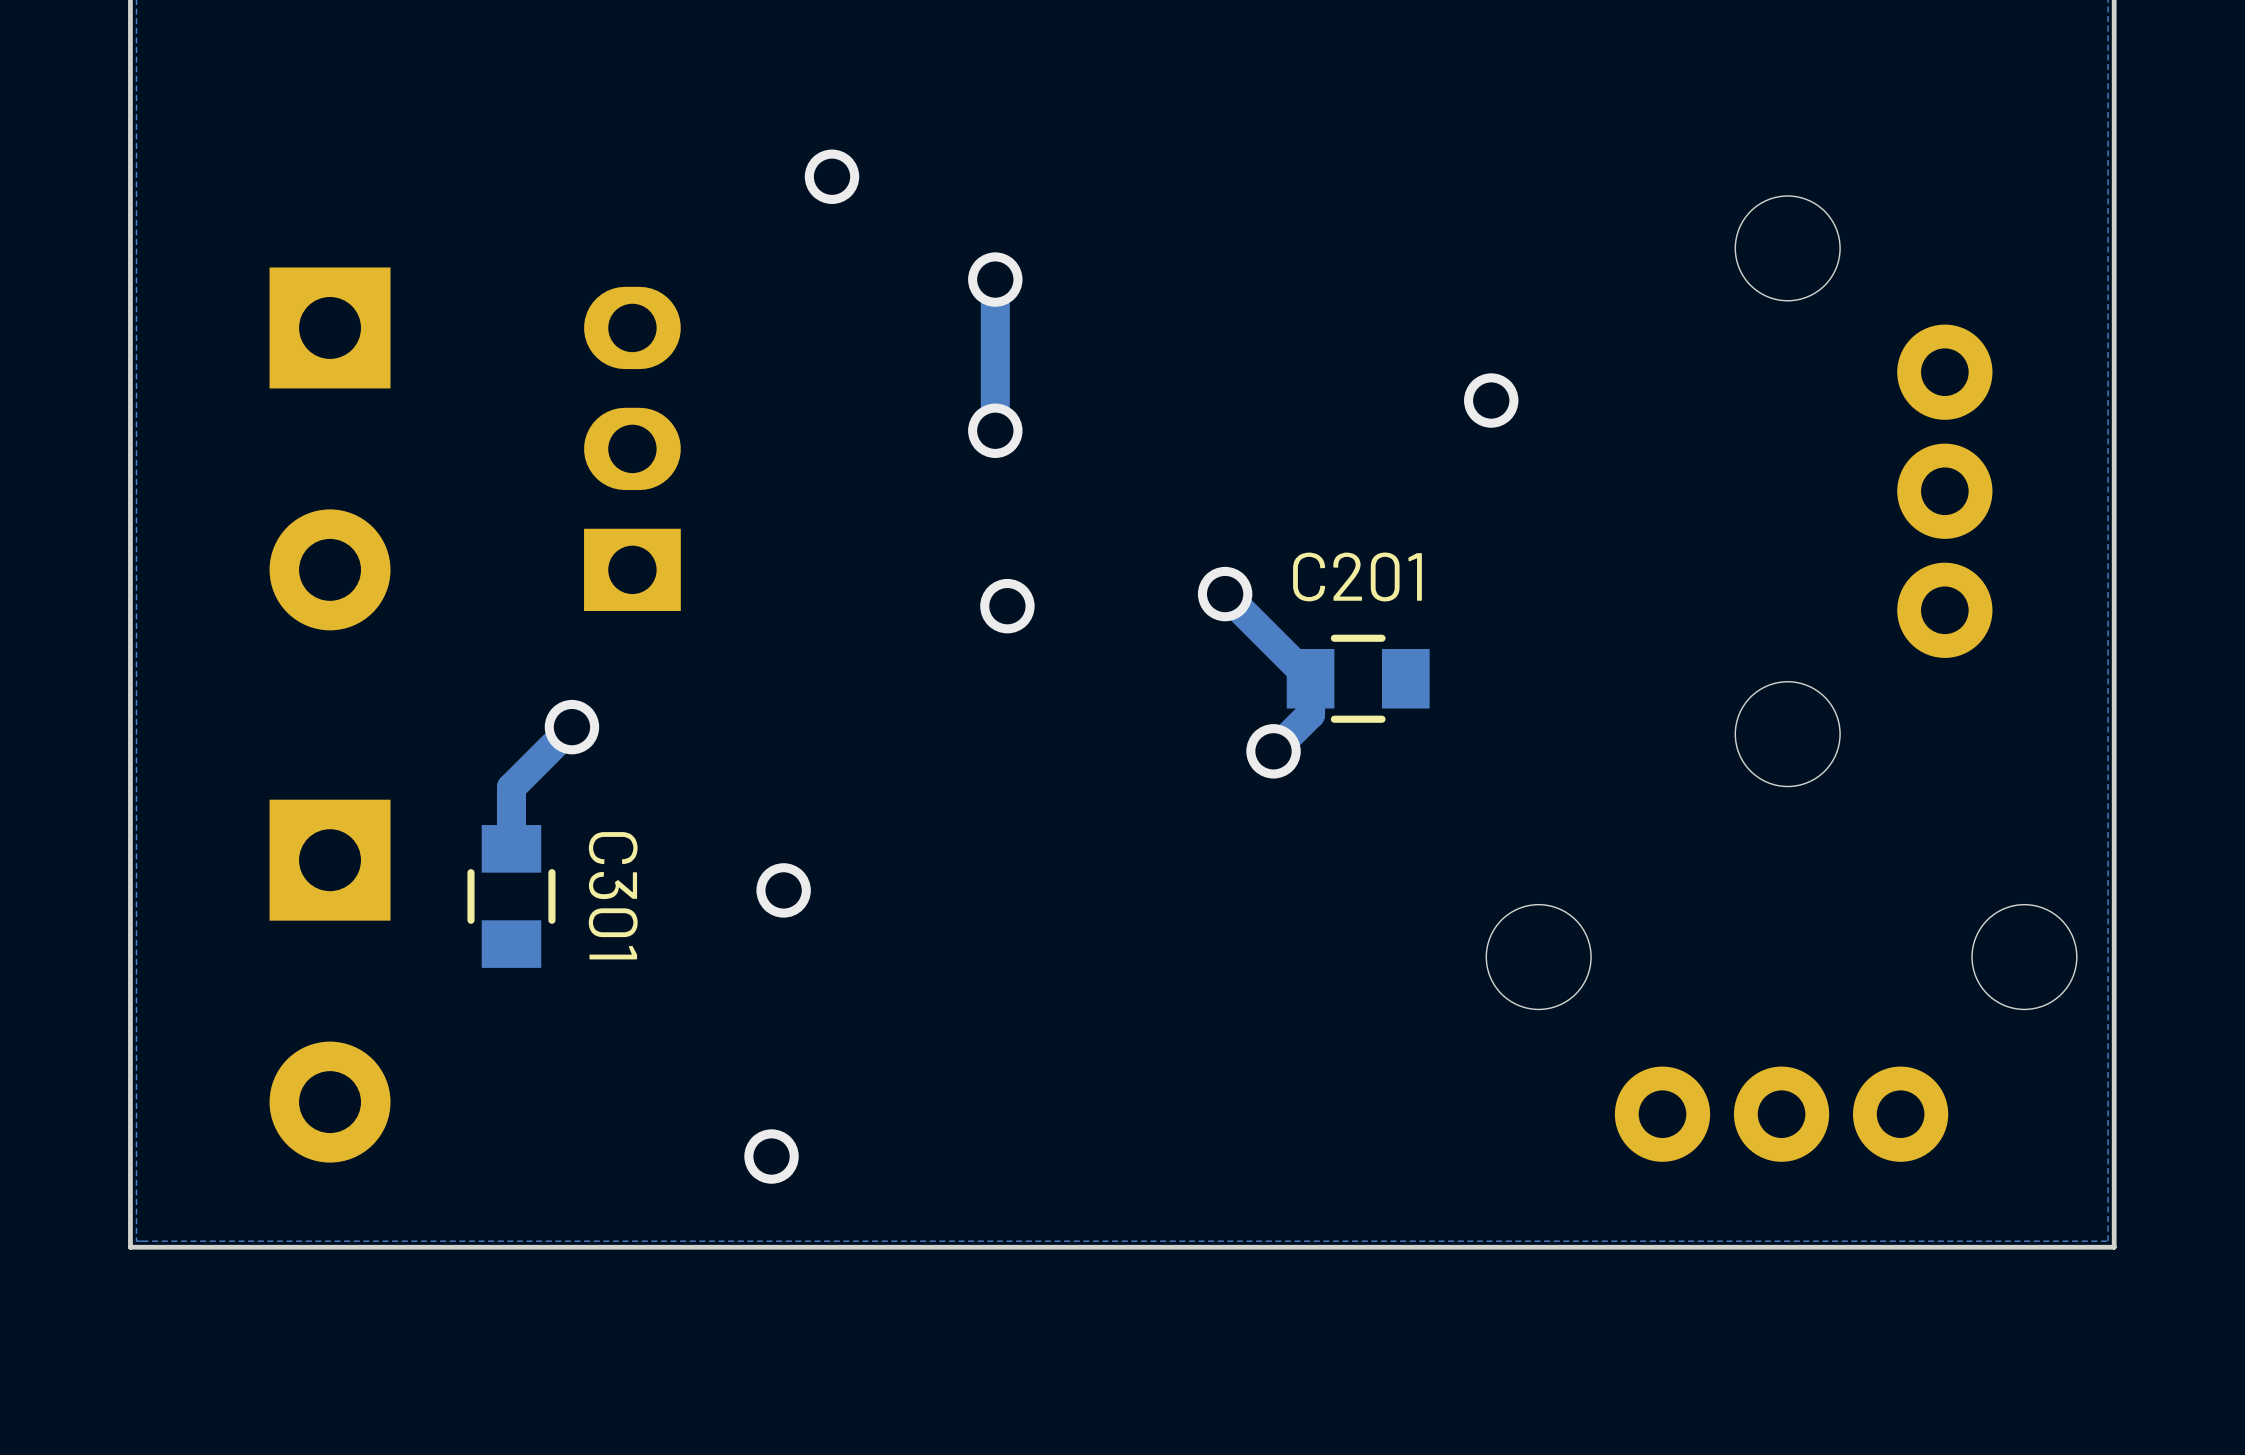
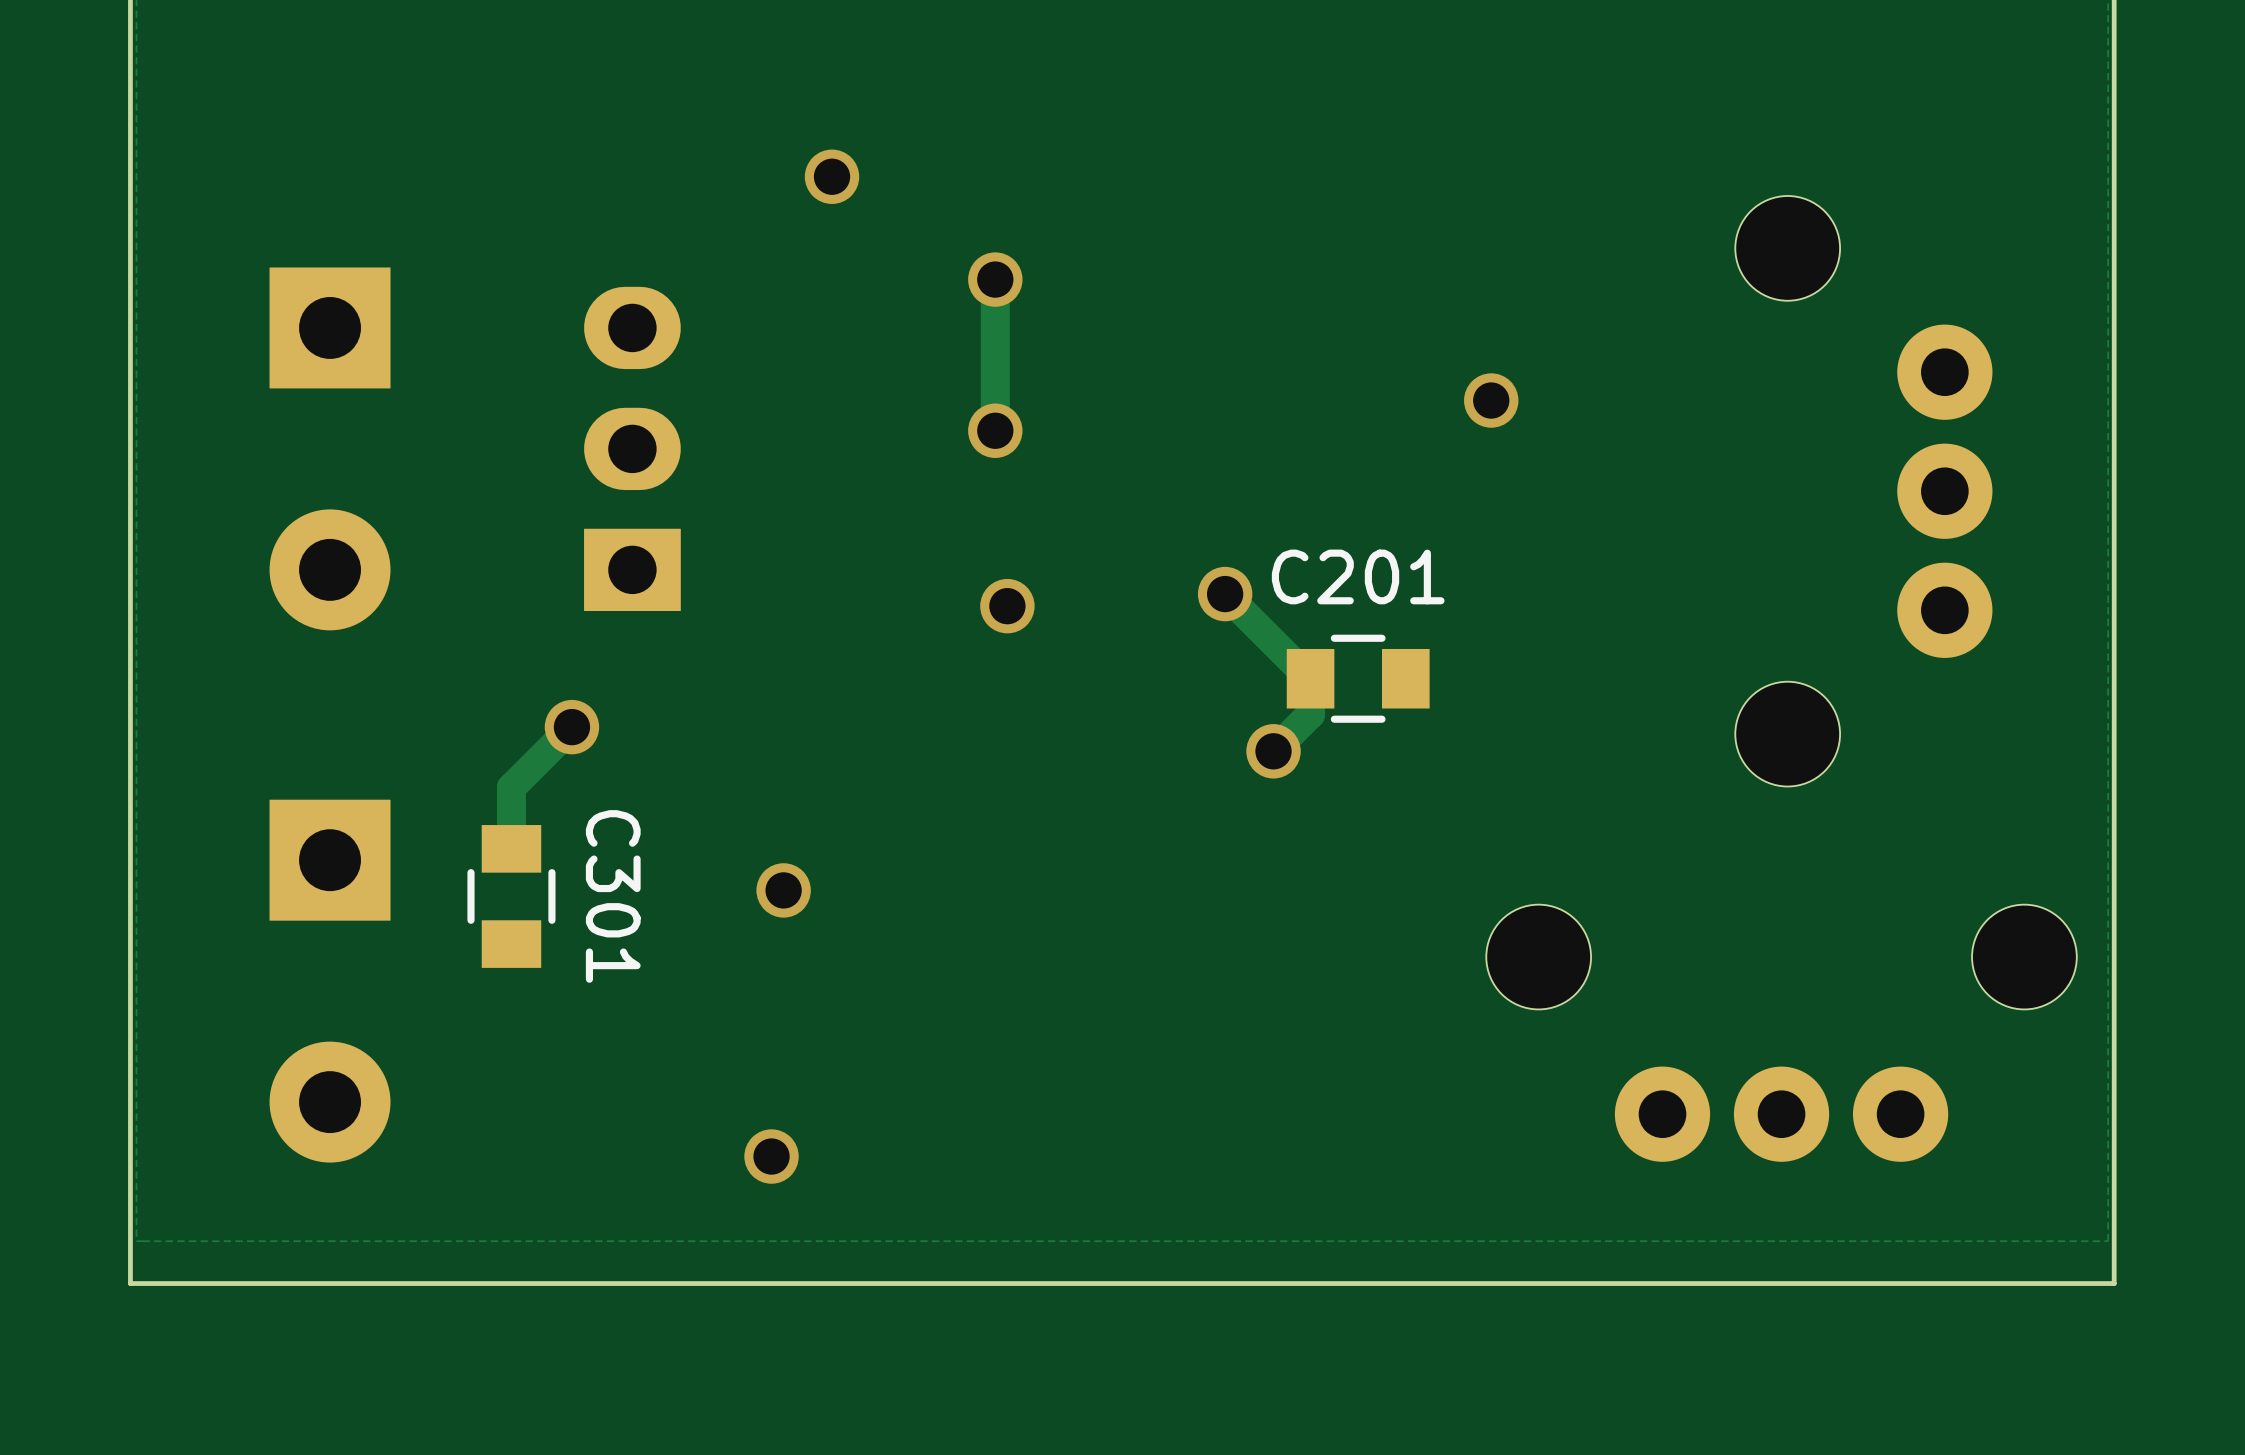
board edge: (2114, 1247) (130, 1247) -> (2114, 1247) (2114, 1283) (130, 1283) (130, 1247)

